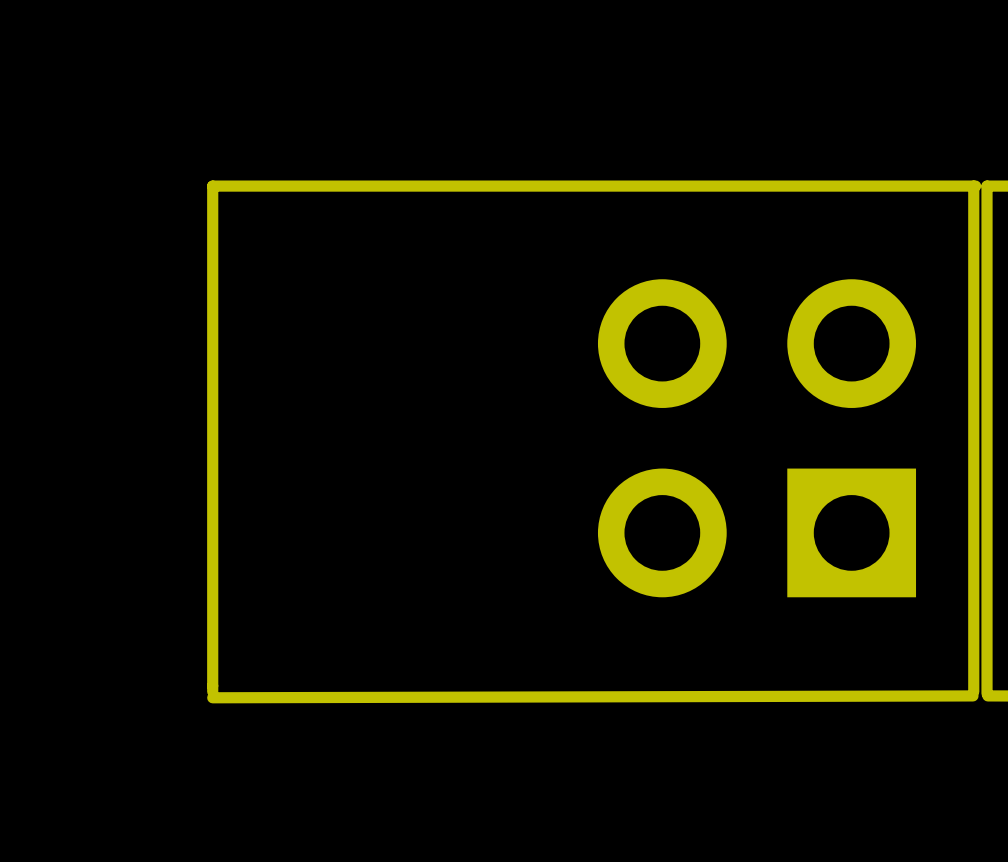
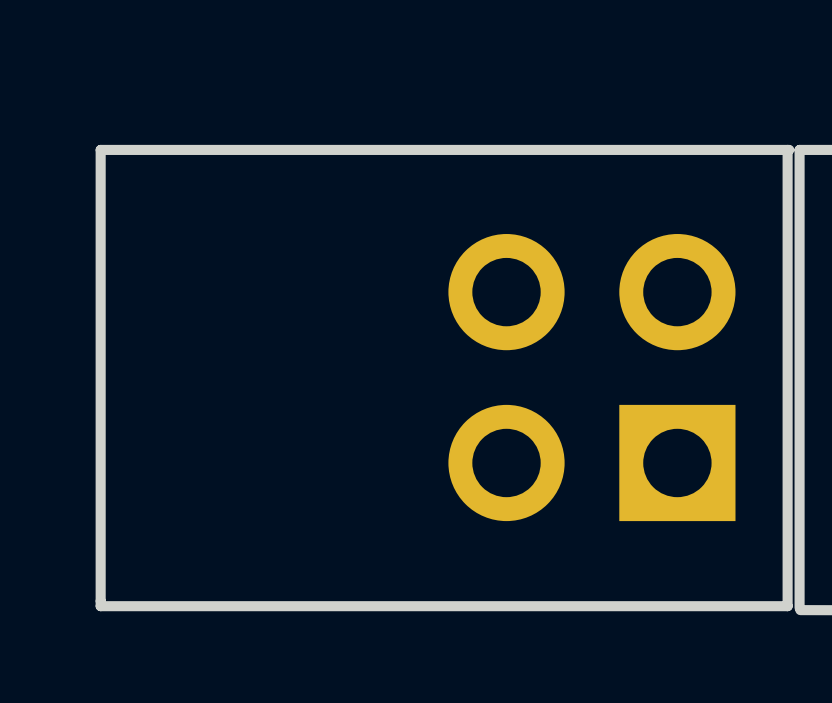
board edge: none -> (787, 606) (100, 606)
board edge: (972, 695) (212, 697) -> none

